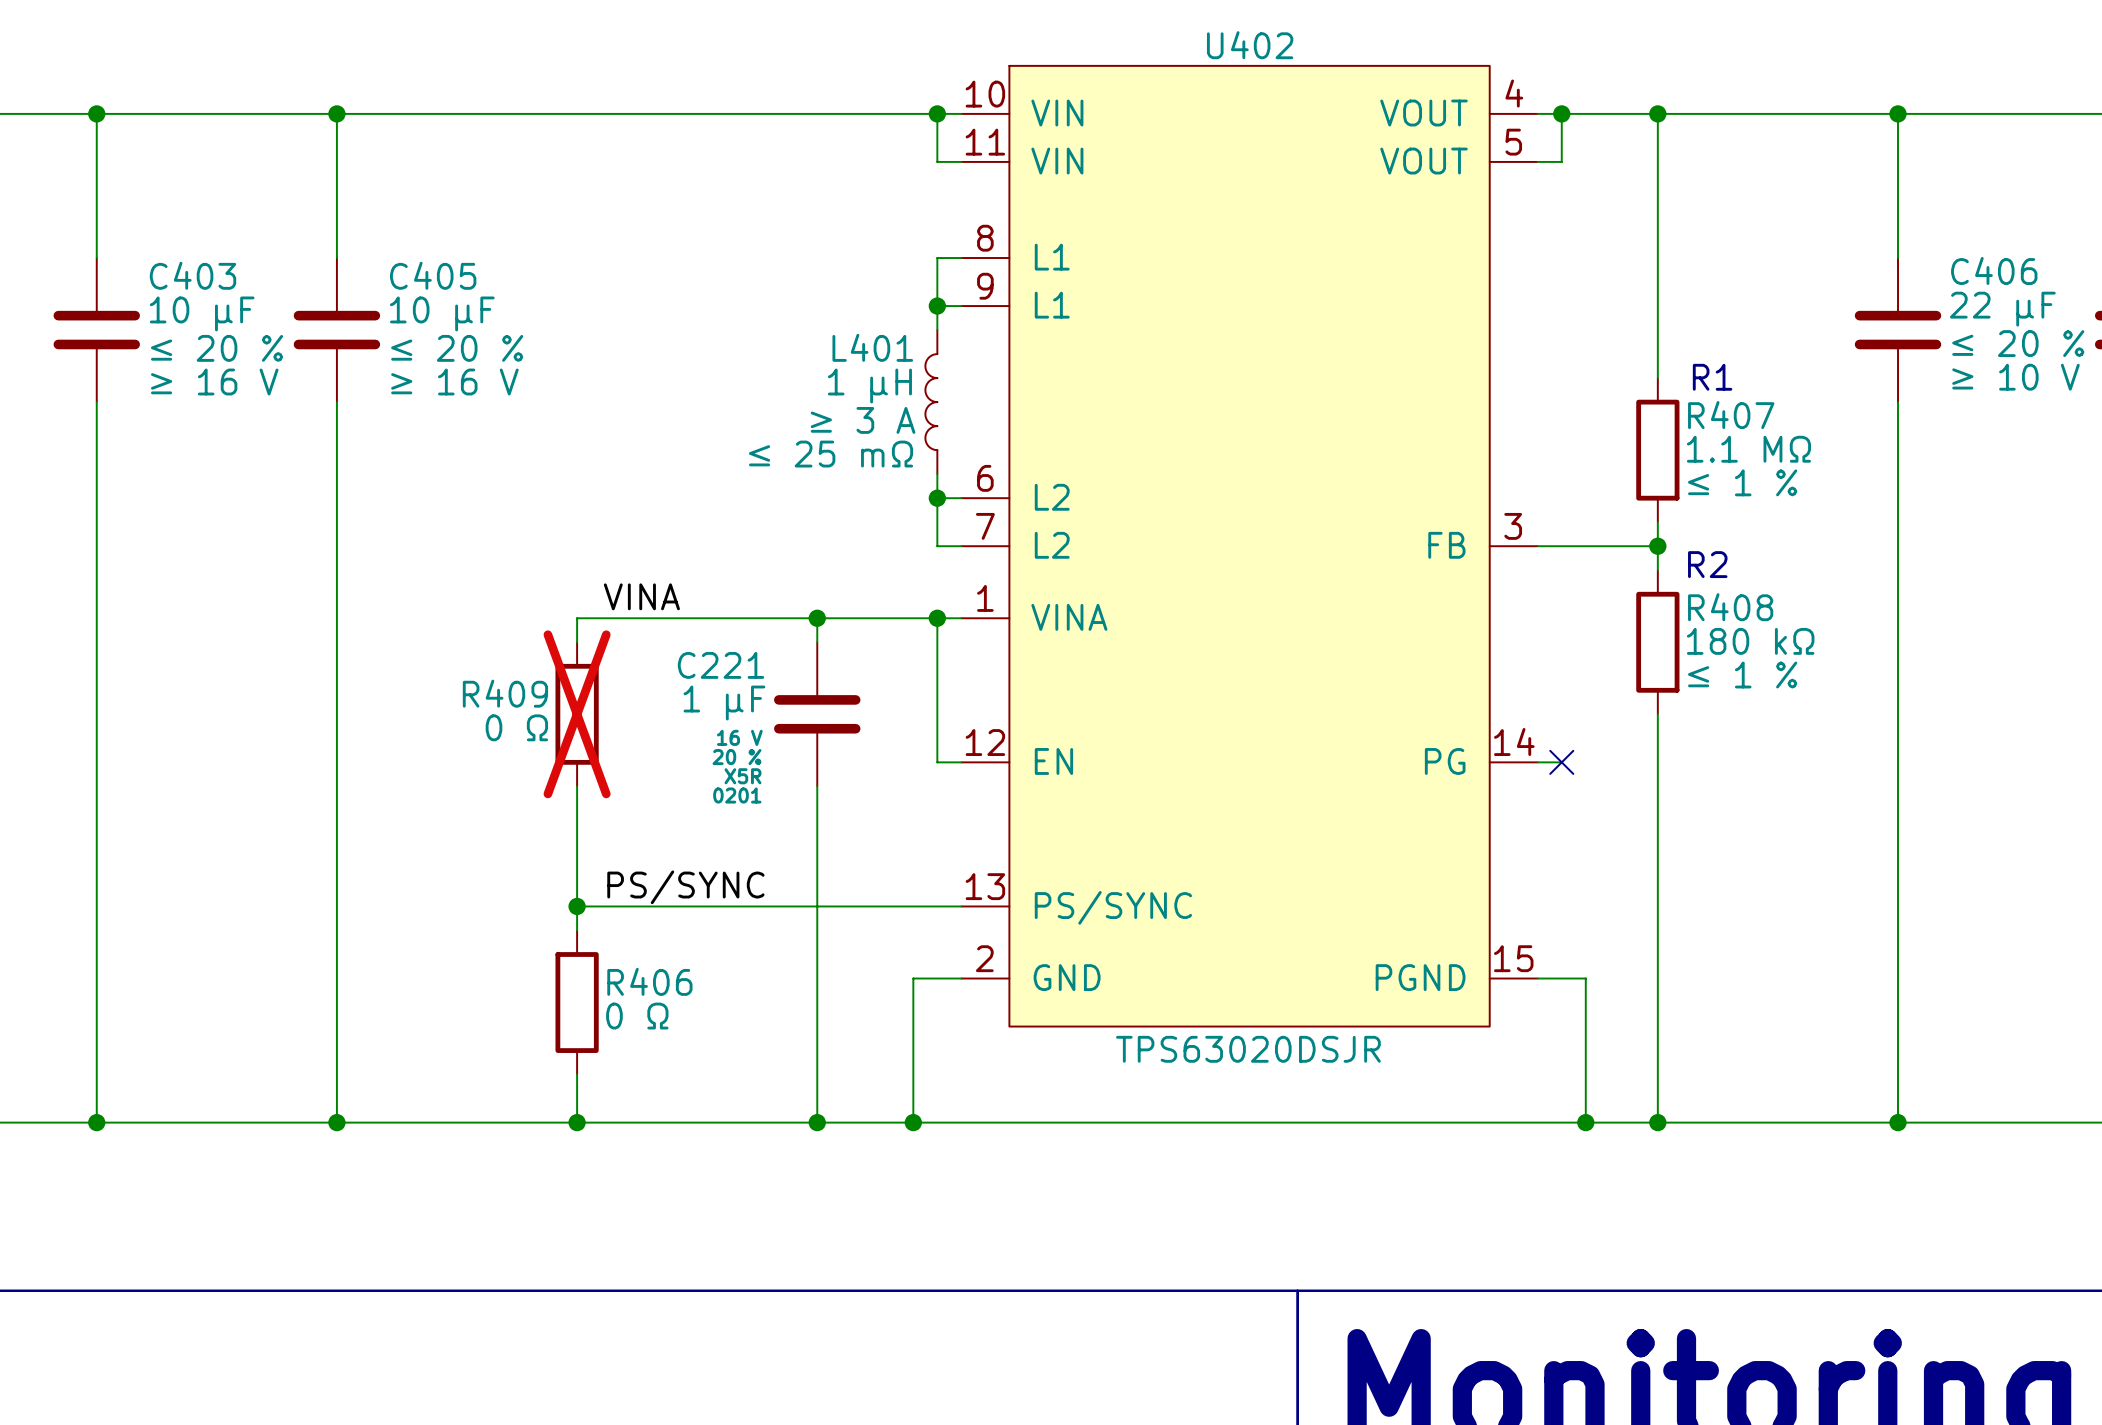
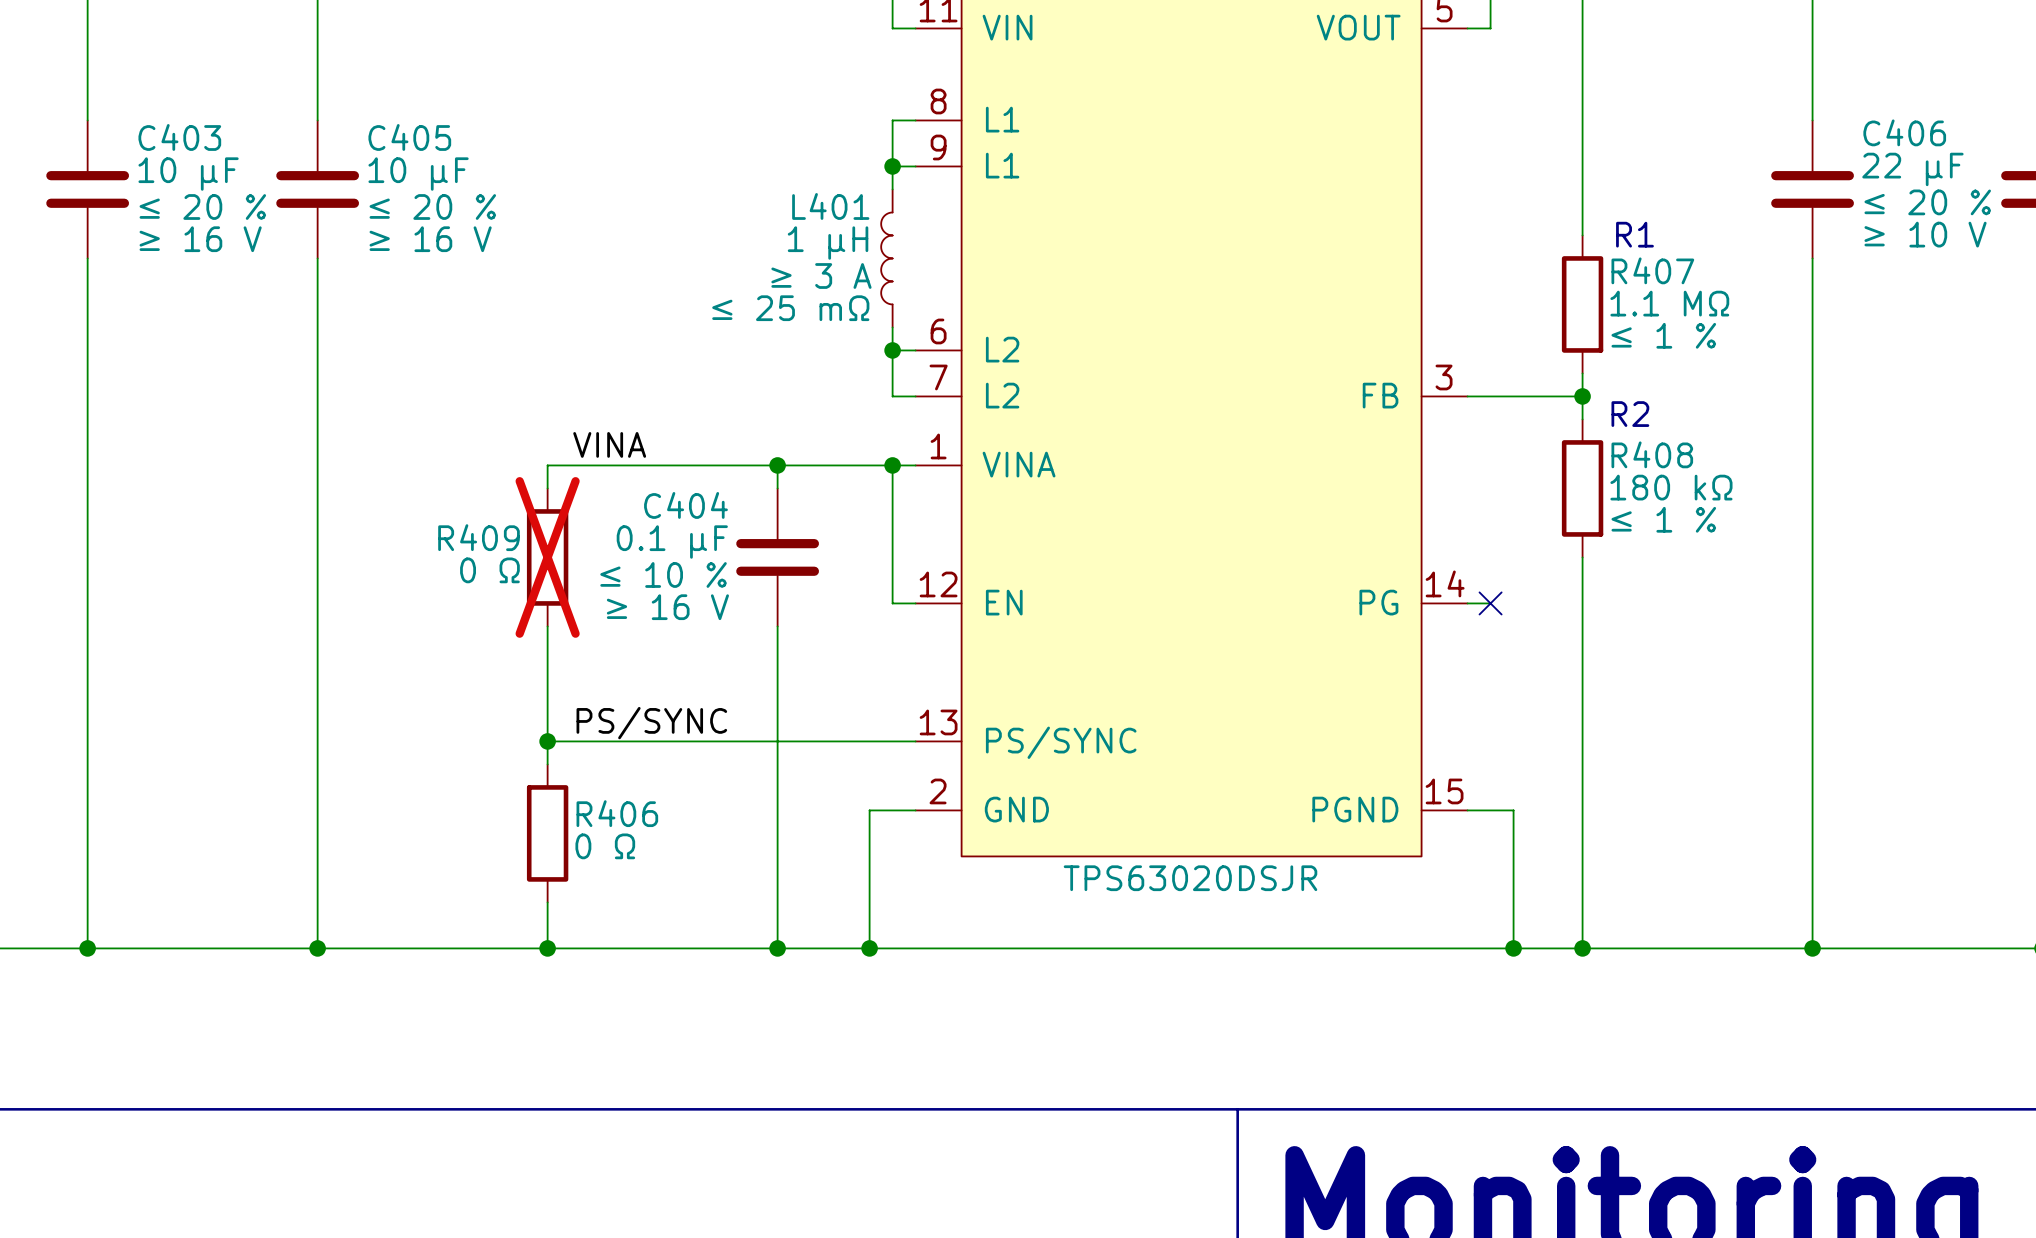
C221 name: C221 (721, 665) -> C404 (685, 505)
C221 value: 1 µF (724, 703) -> 0.1 µF (672, 542)
C221 text: 16 V (739, 737) -> none
C221 text: 20 % (737, 757) -> ≤ 10 % (663, 574)
C221 text: none -> ≥ 16 V (667, 607)
C221 text: X5R (742, 776) -> none
C221 text: 0201 (737, 795) -> none

